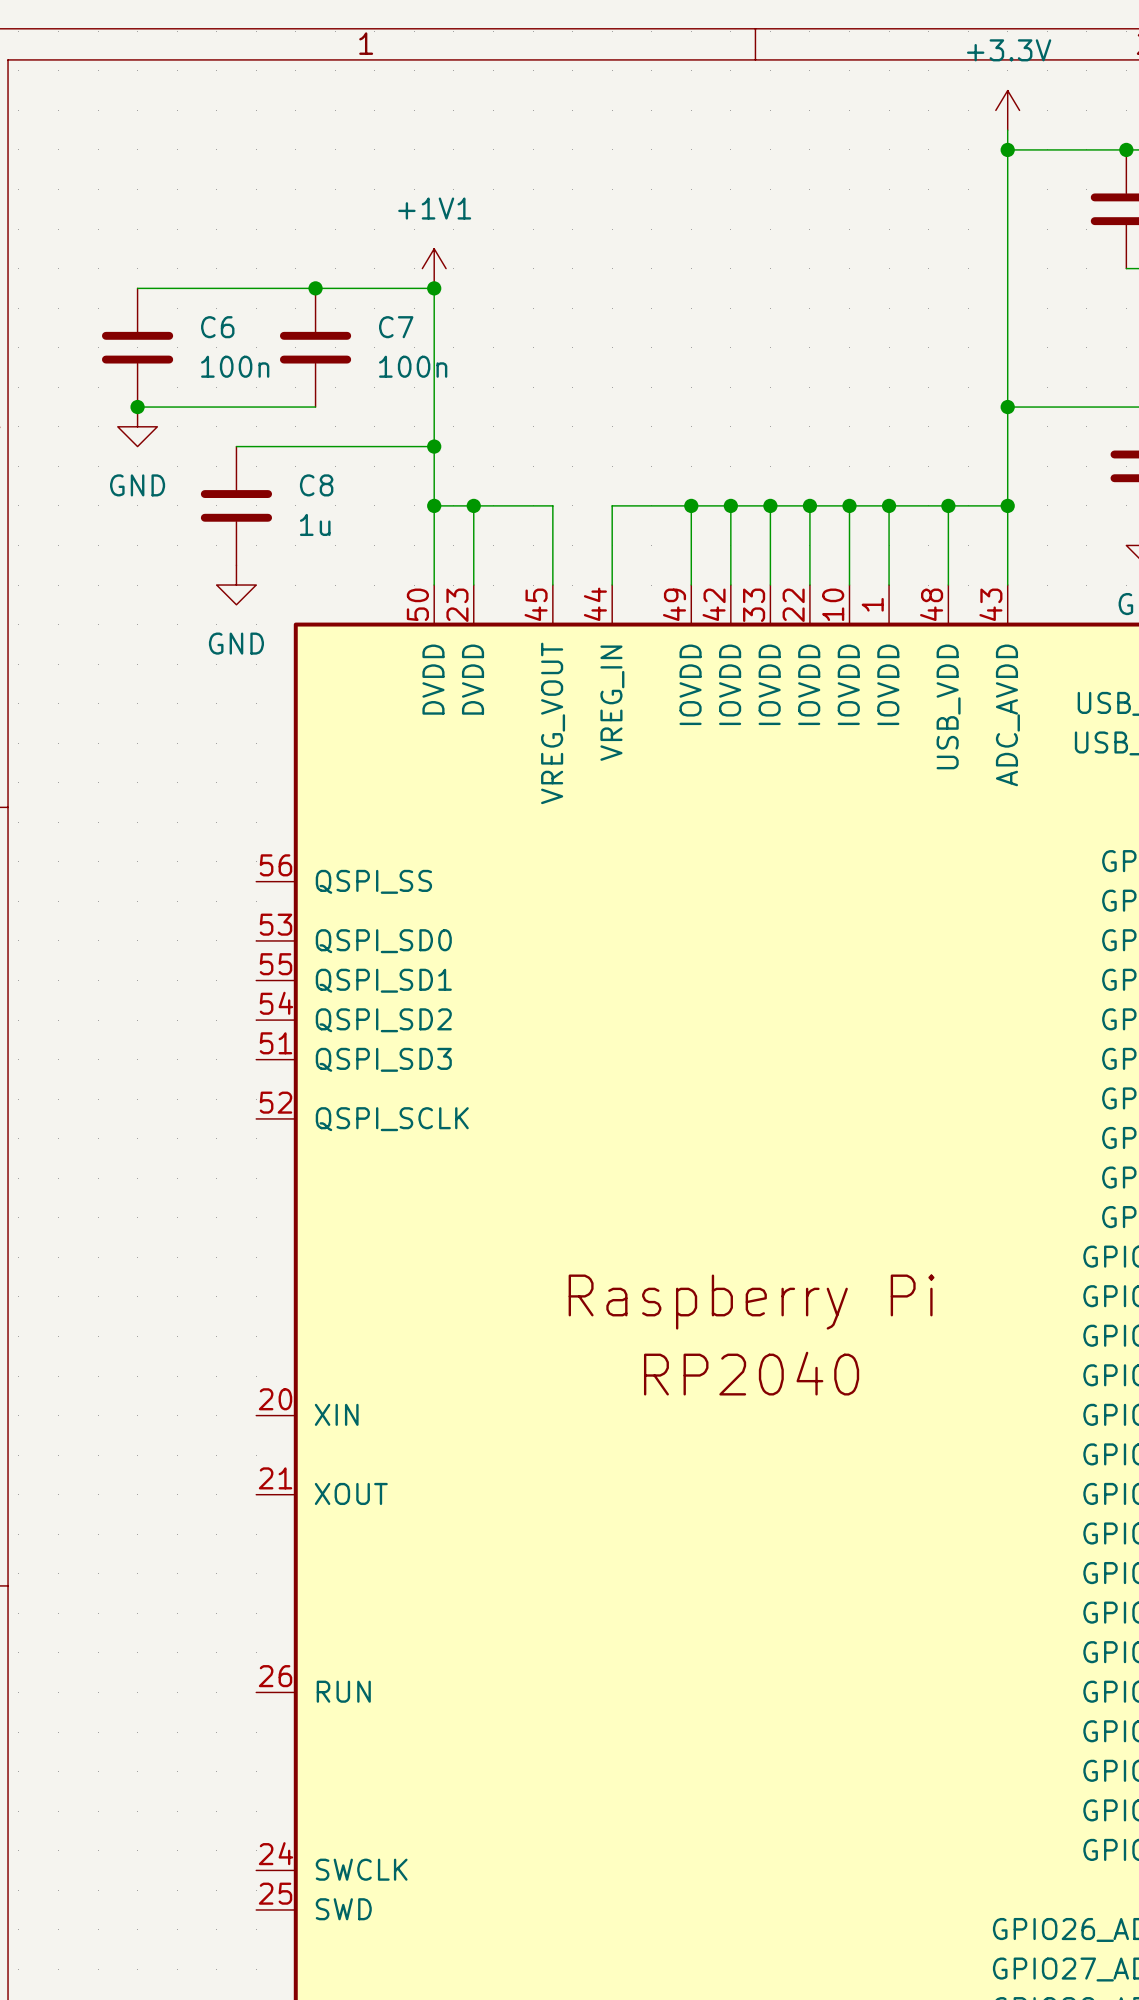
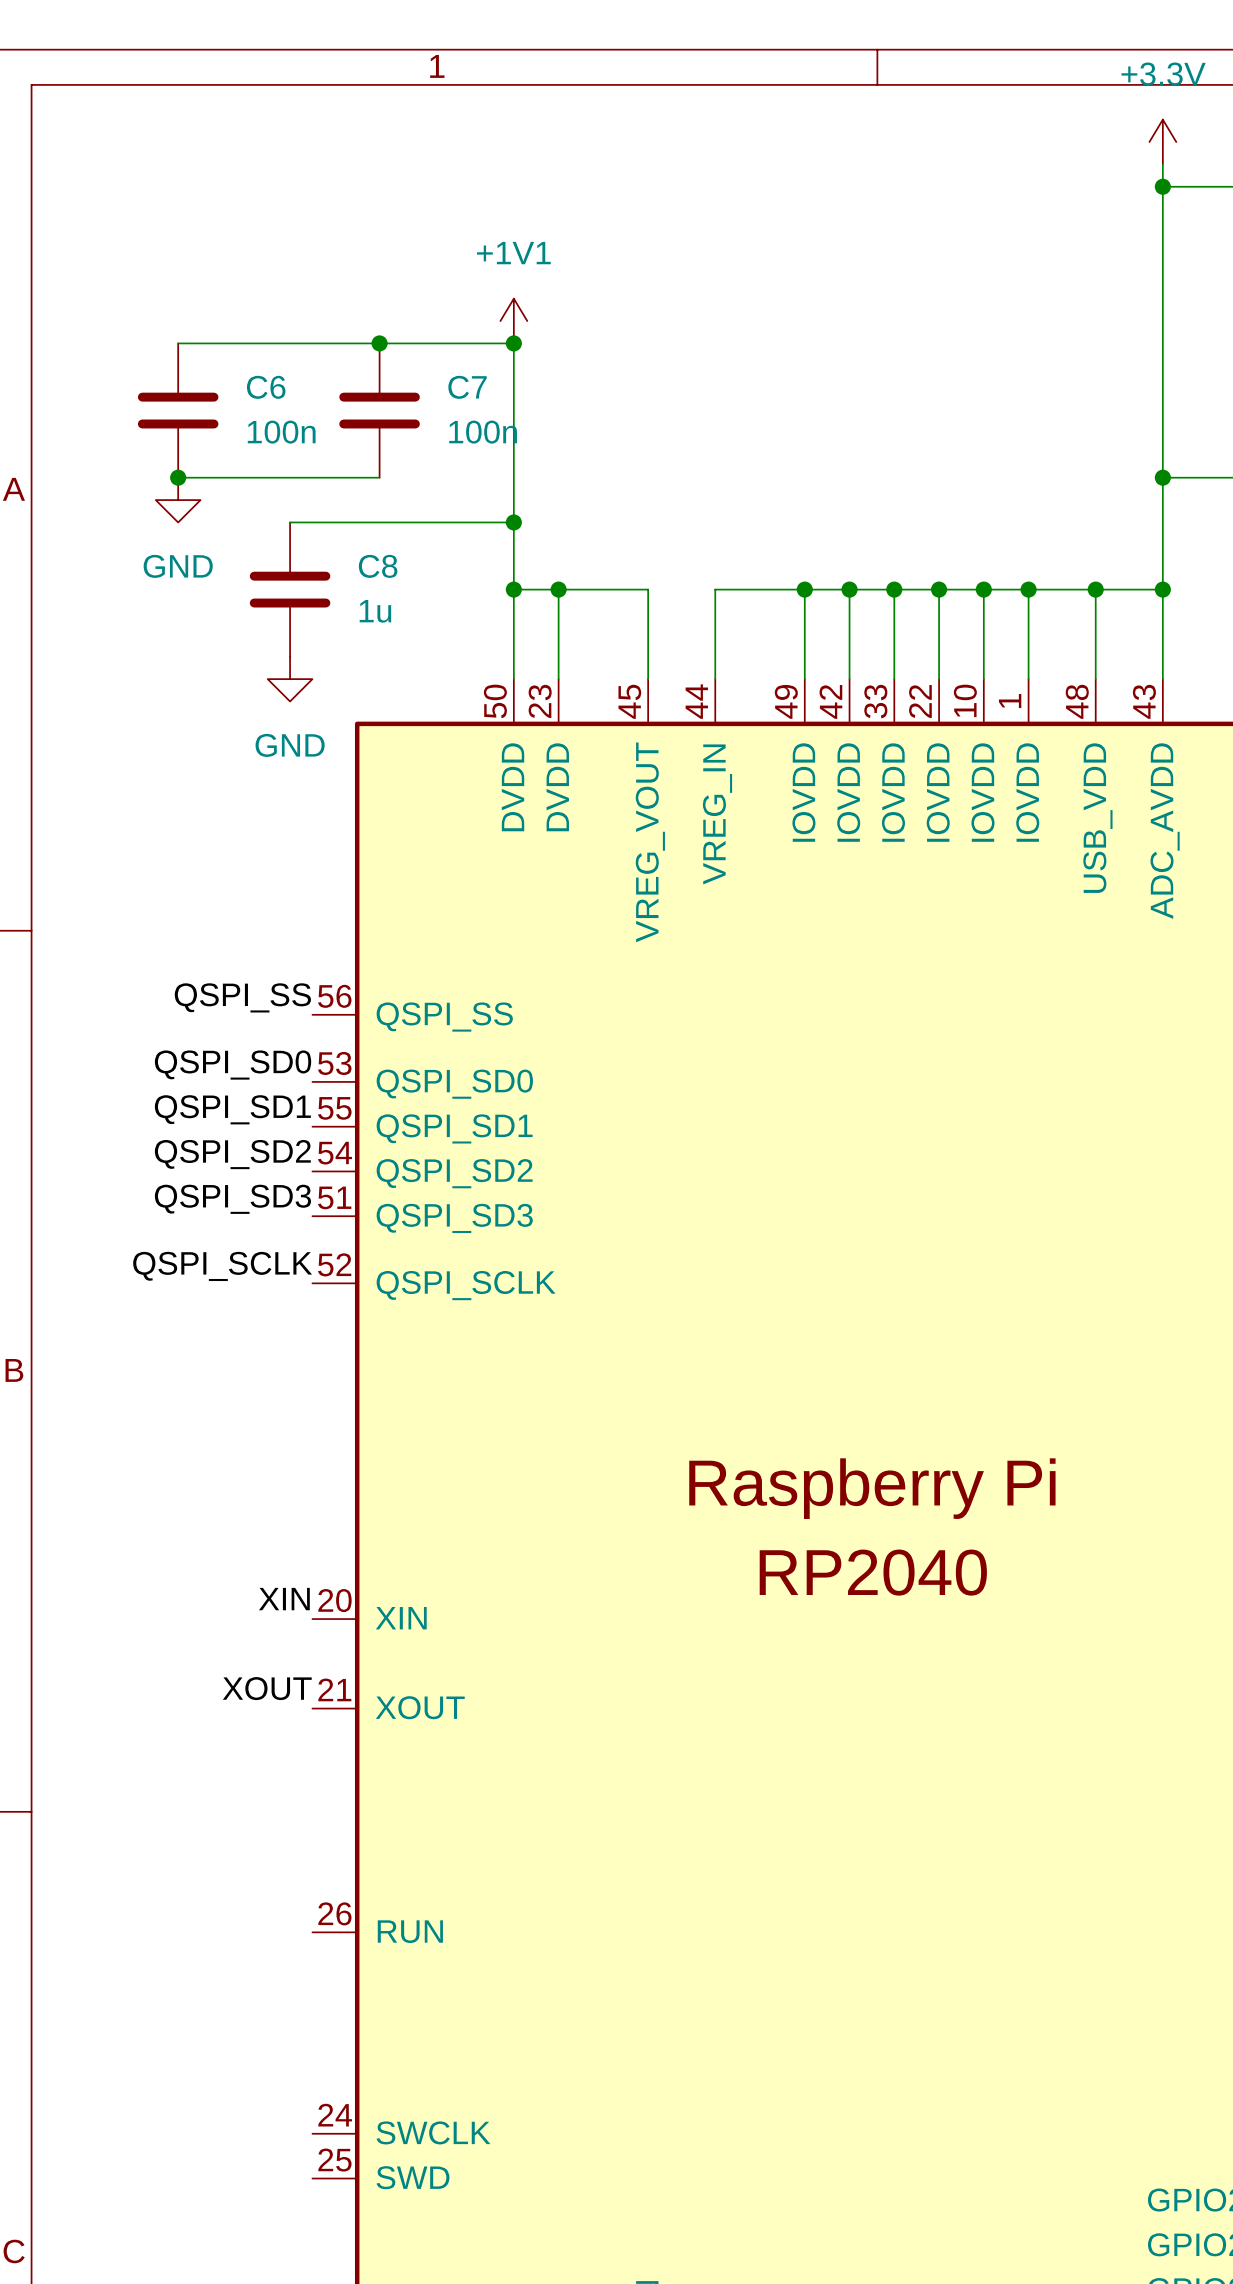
label: none -> QSPI_SS (242, 997)
label: none -> QSPI_SD0 (233, 1065)
label: none -> QSPI_SD1 (232, 1109)
label: none -> QSPI_SD2 (232, 1154)
label: none -> QSPI_SD3 (232, 1199)
label: none -> QSPI_SCLK (222, 1266)
label: none -> XIN (284, 1599)
label: none -> XOUT (267, 1688)

